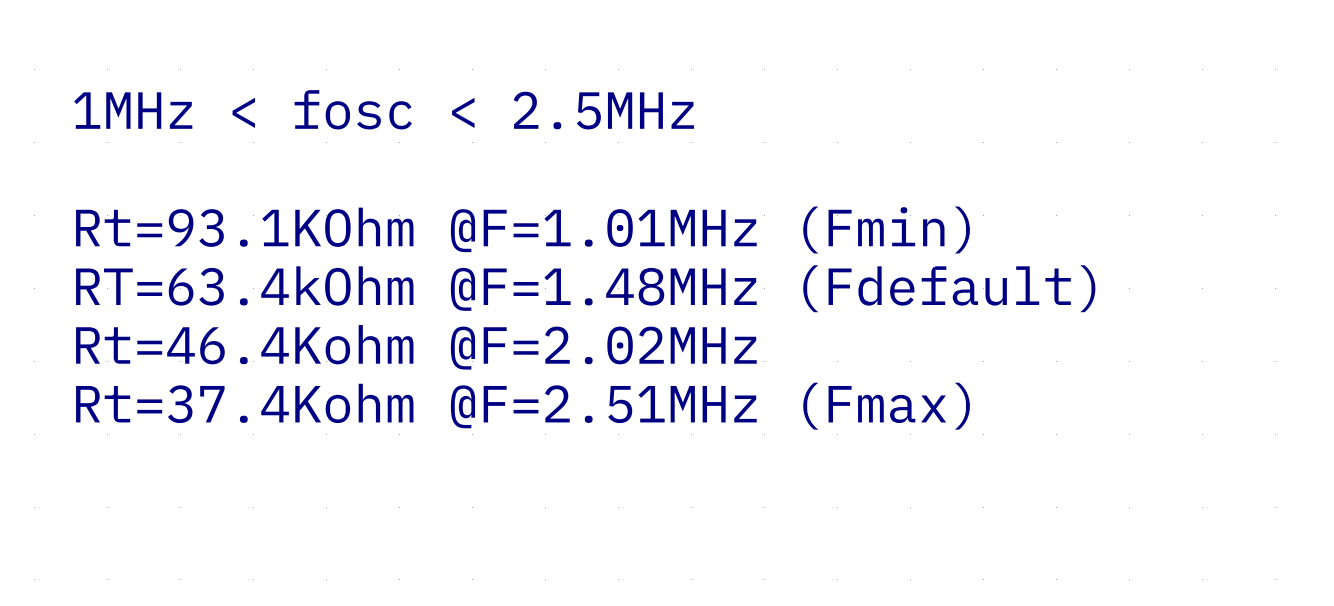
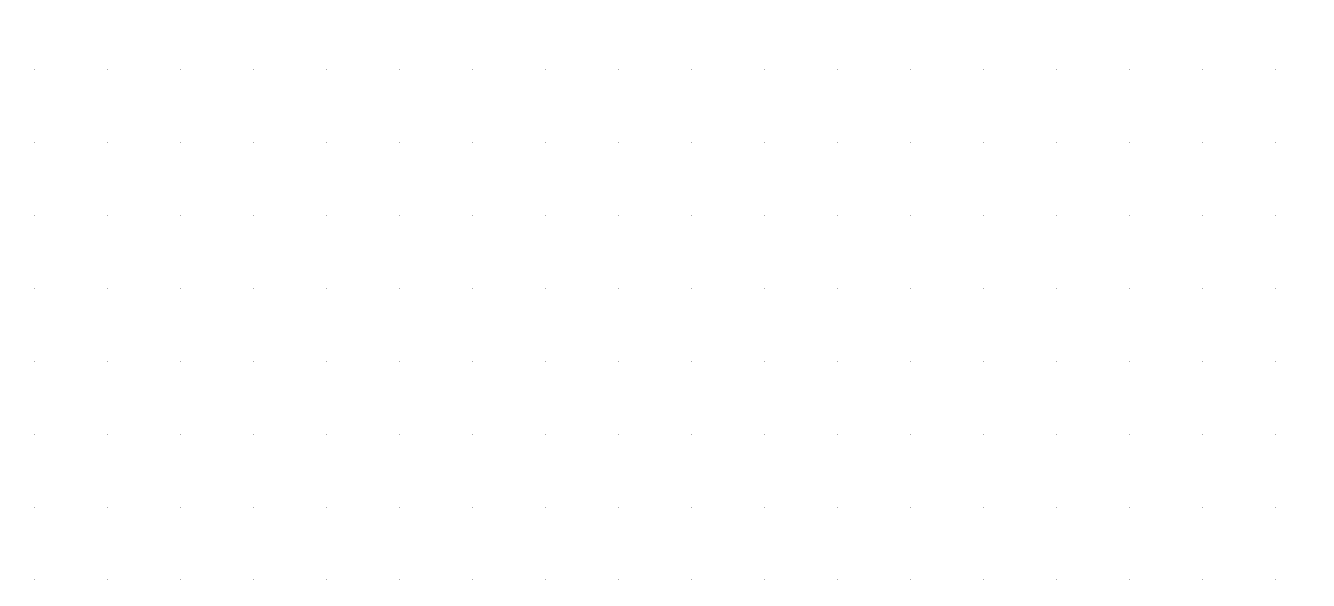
text: 1MHz < fosc < 2.5MHz (384, 109) -> none
text: Rt=93.1KOhm @F=1.01MHz (Fmin) (523, 230) -> none
text: RT=63.4kOhm @F=1.48MHz (Fdefault) (585, 288) -> none
text: Rt=46.4Kohm @F=2.02MHz (416, 347) -> none
text: Rt=37.4Kohm @F=2.51MHz (Fmax) (523, 406) -> none

